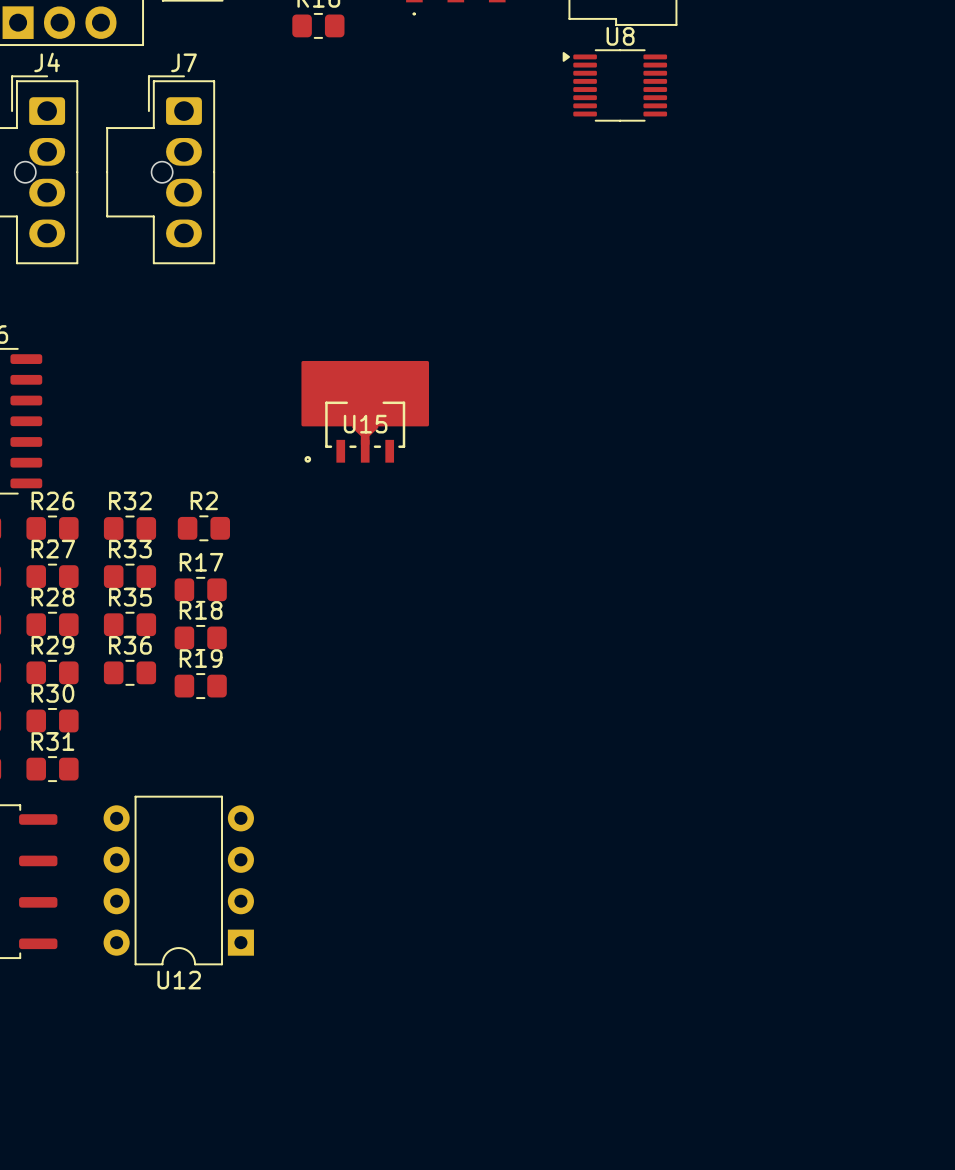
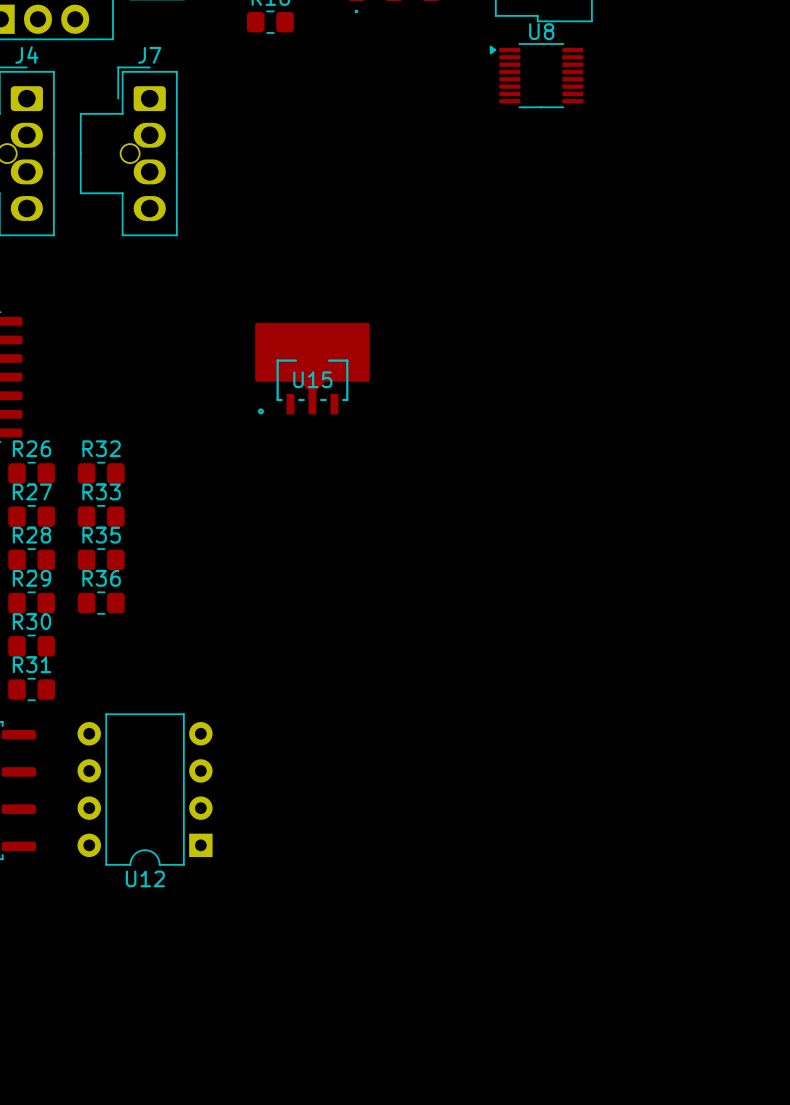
R2: (203, 528) -> none
R17: (200, 589) -> none
R18: (200, 637) -> none
R19: (200, 686) -> none

